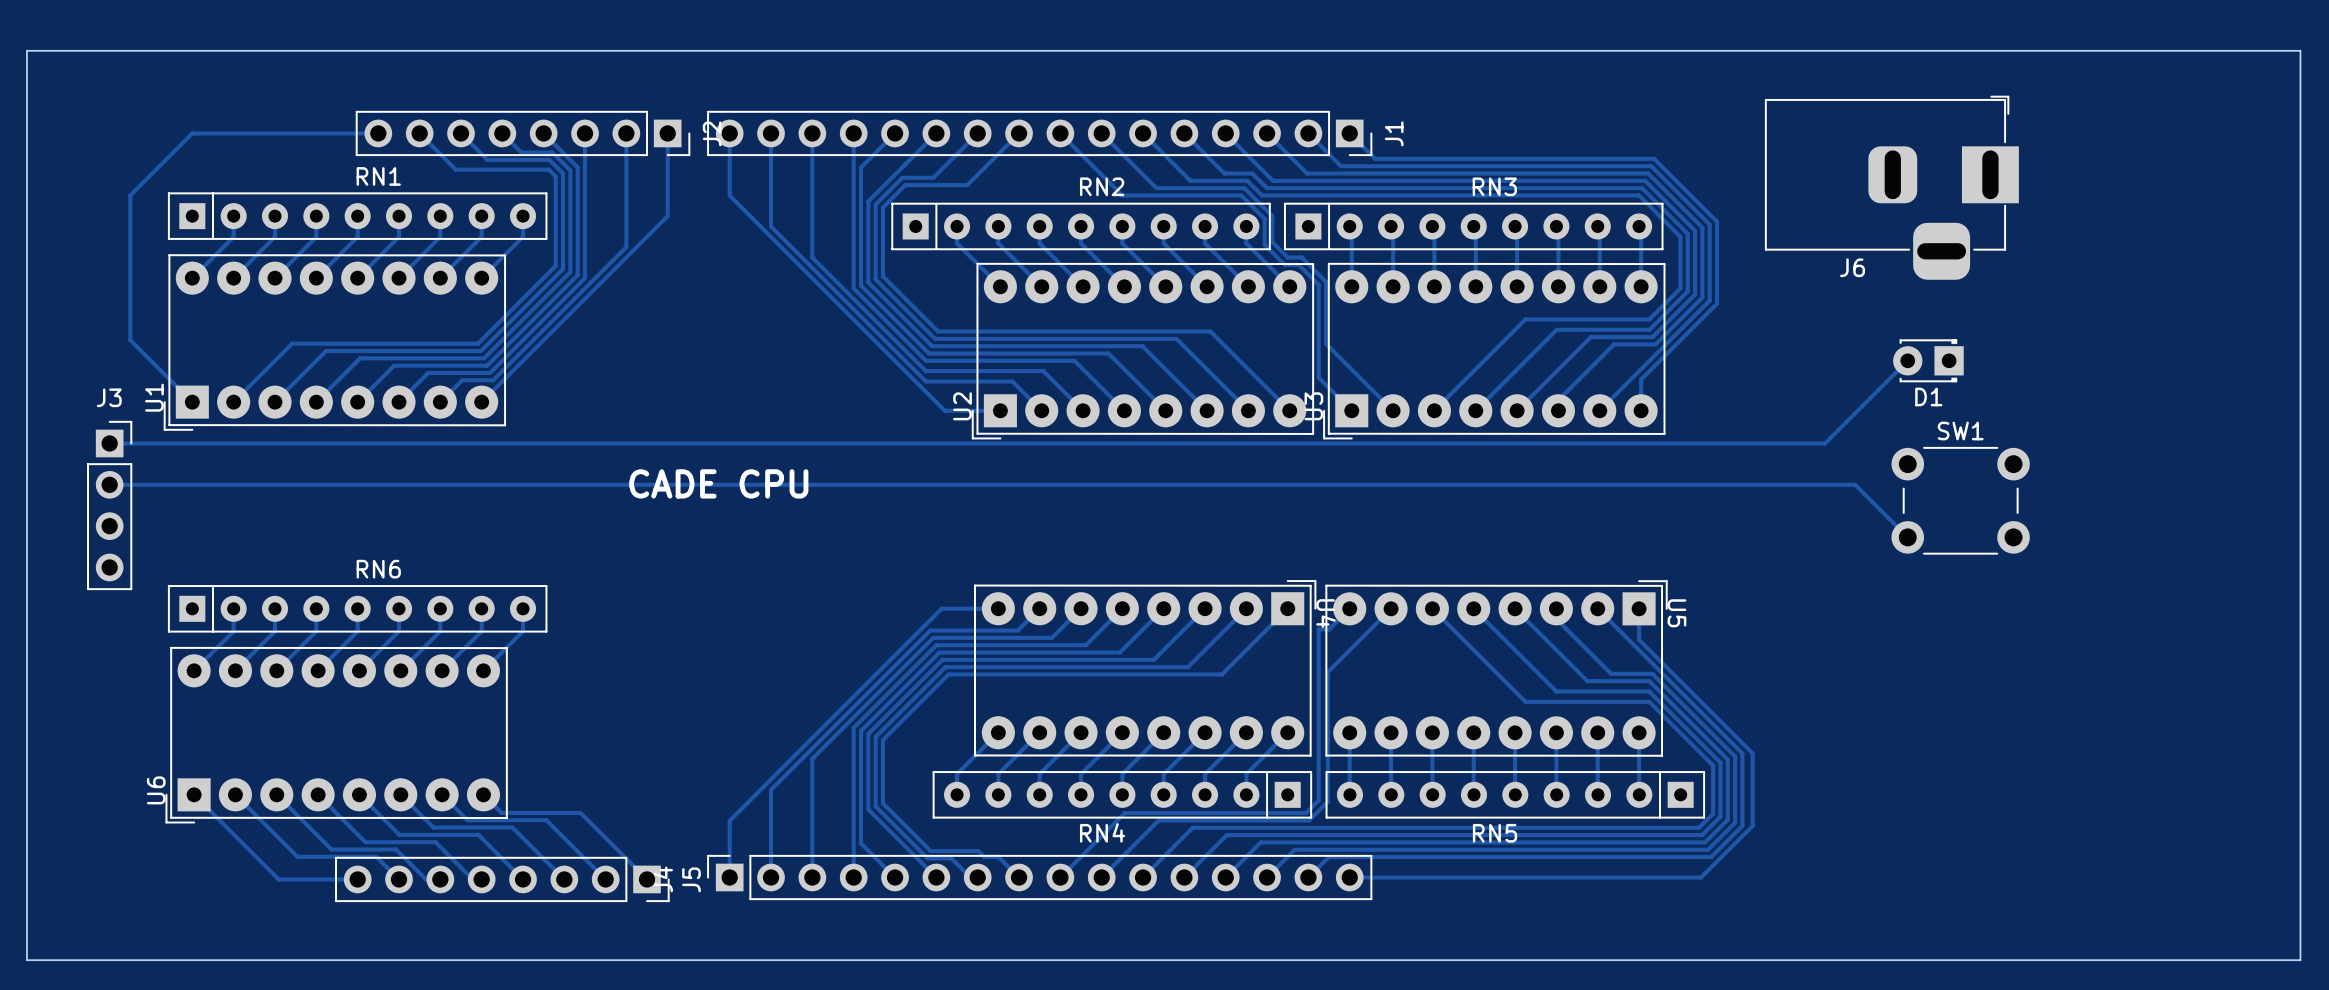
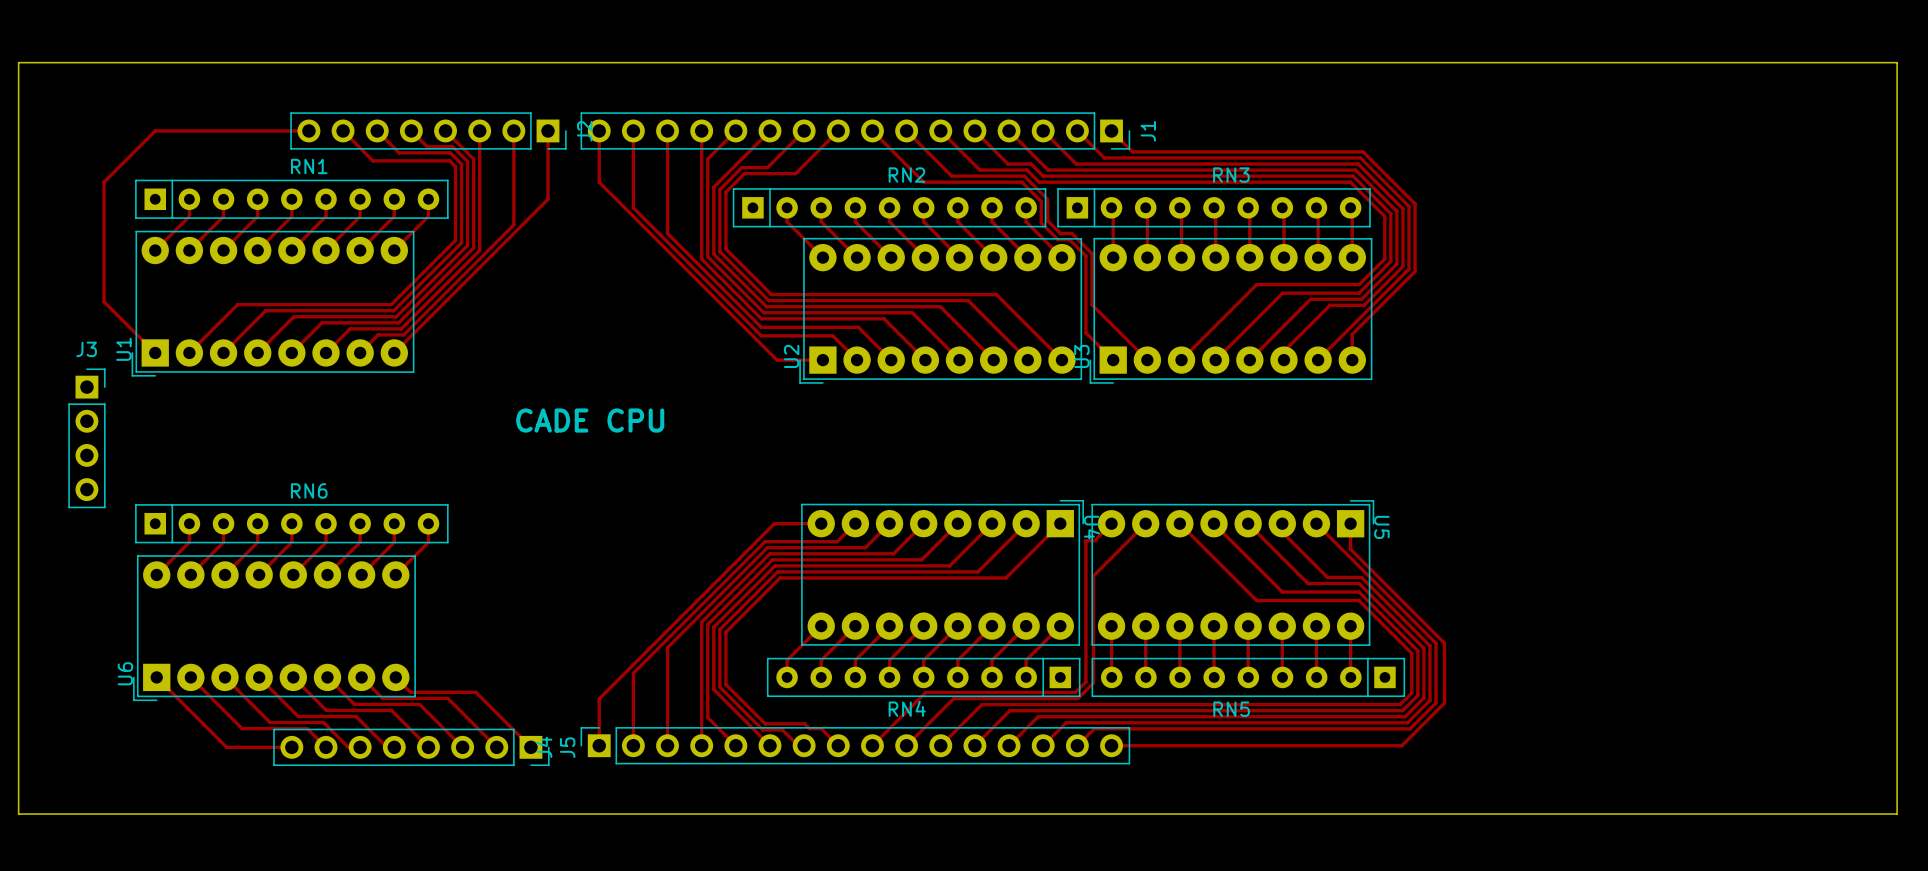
J6: (1891, 187) -> none
track: (1907, 360) (1825, 443) (109, 443) -> none
D1: (1928, 360) -> none
track: (109, 484) (1855, 484) (1907, 537) -> none
SW1: (1960, 500) -> none

